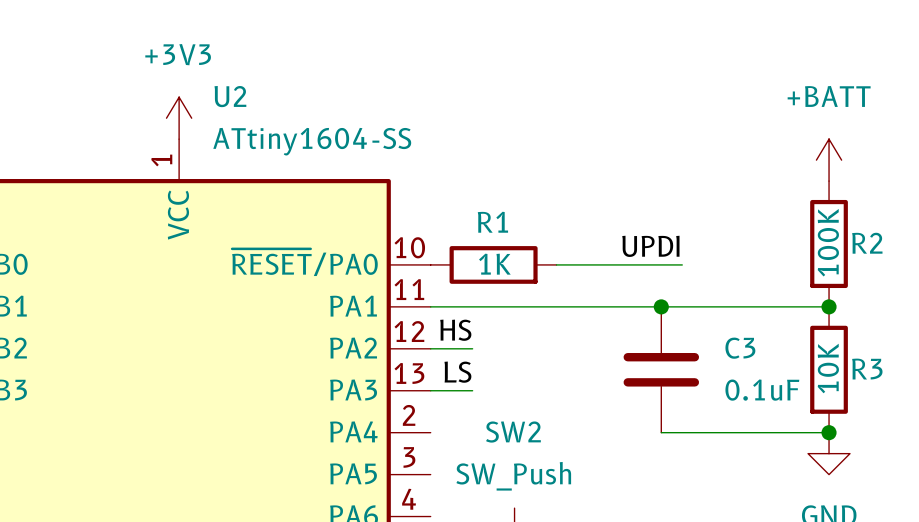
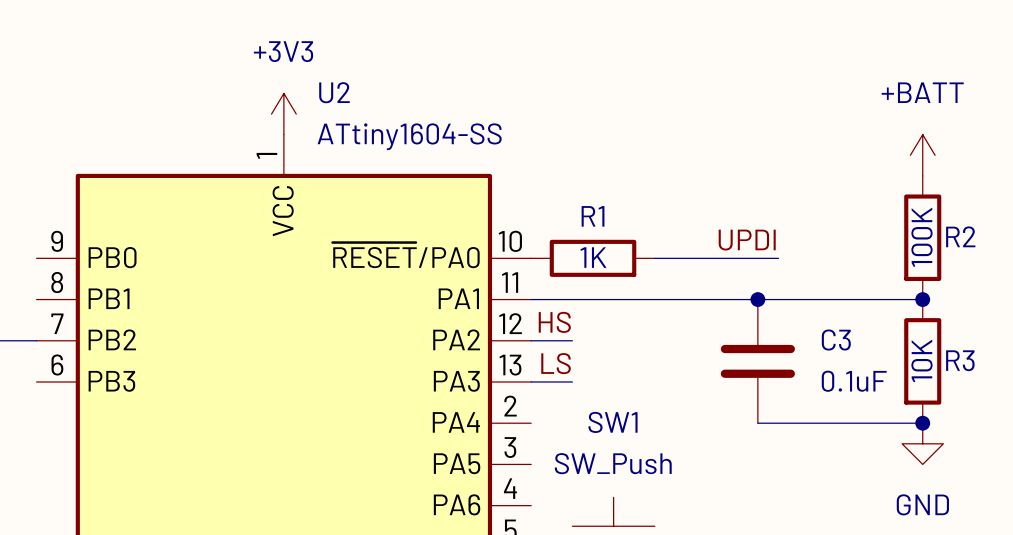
SW2 name: SW2 (513, 432) -> SW1 (613, 422)

